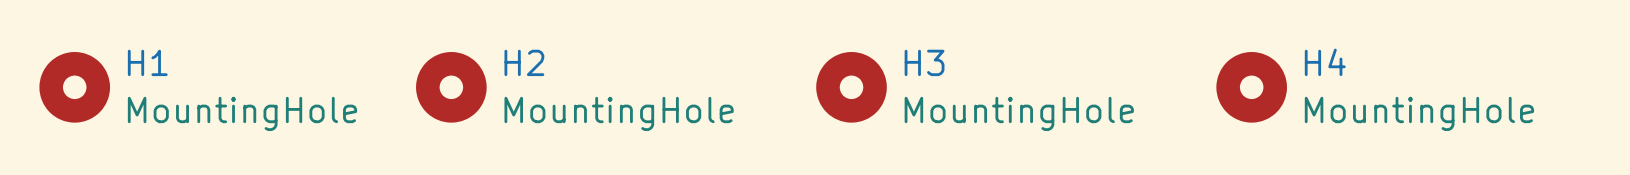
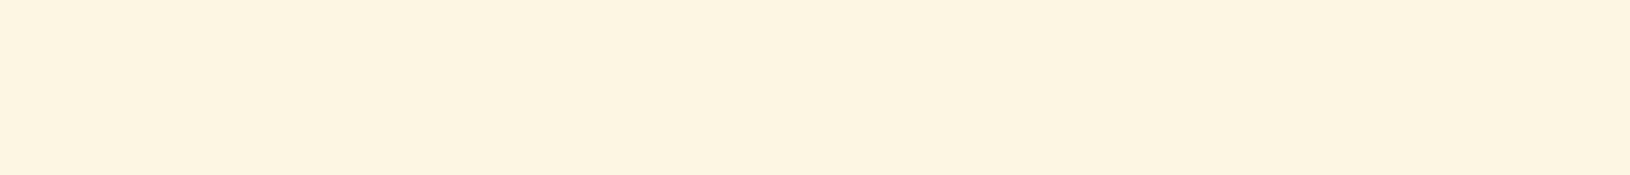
H1: MountingHole (74, 87) -> none
H2: MountingHole (451, 87) -> none
H3: MountingHole (851, 87) -> none
H4: MountingHole (1251, 87) -> none

